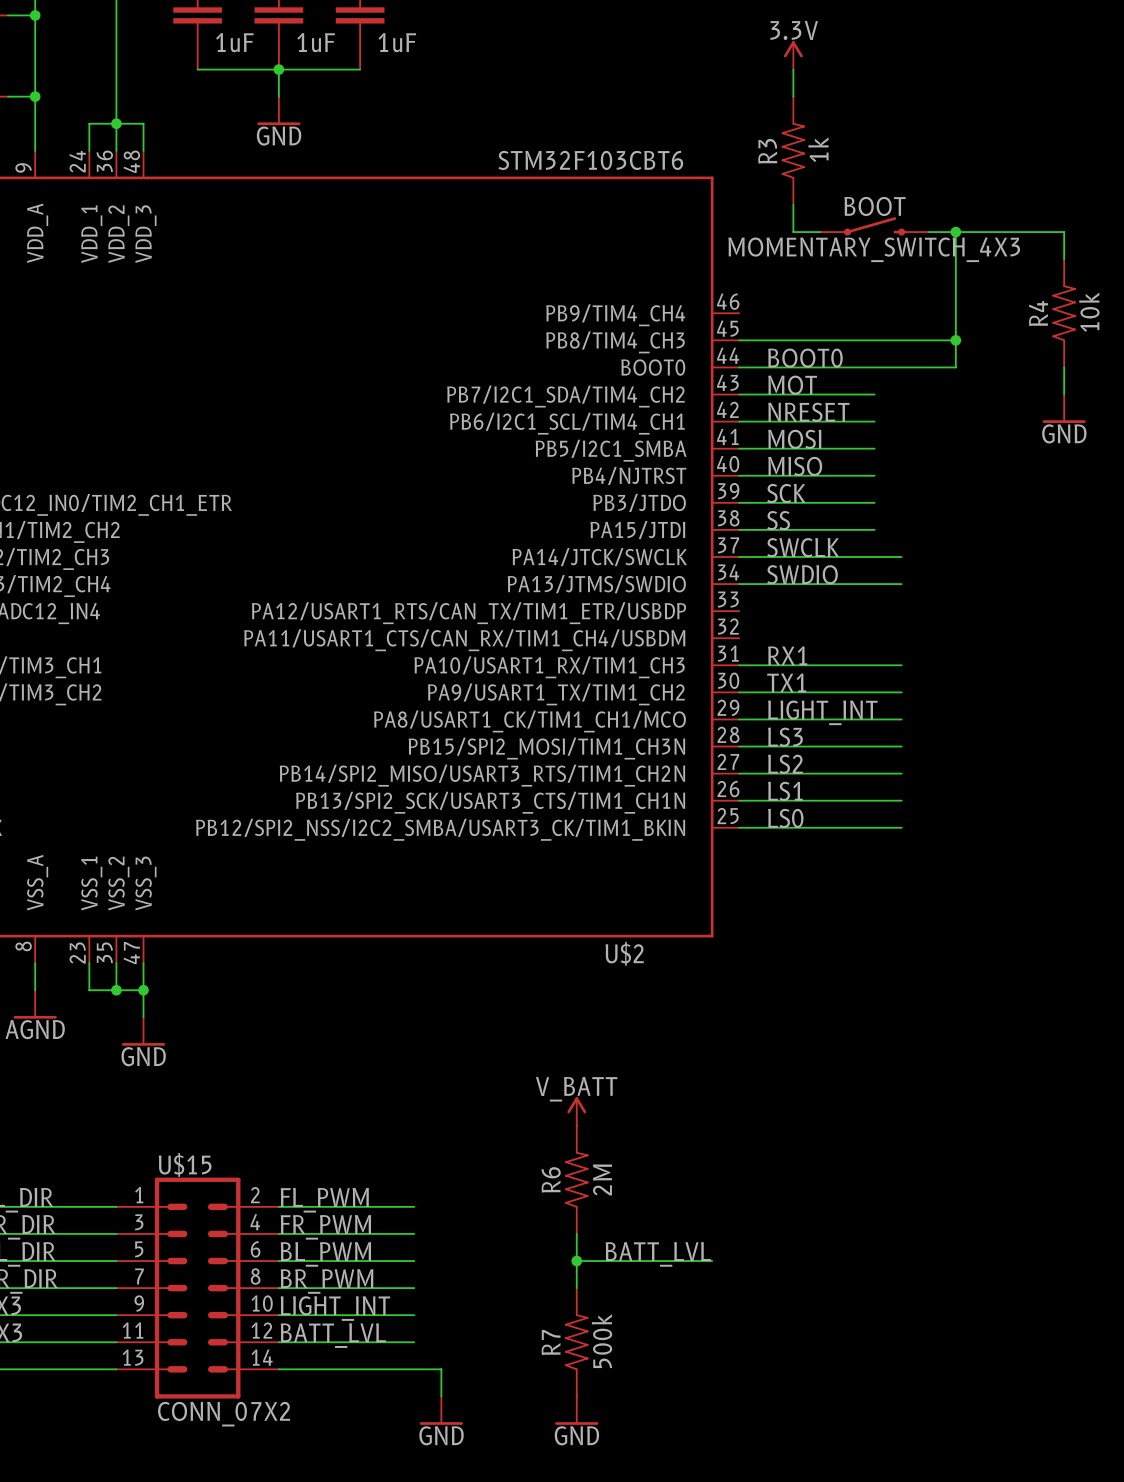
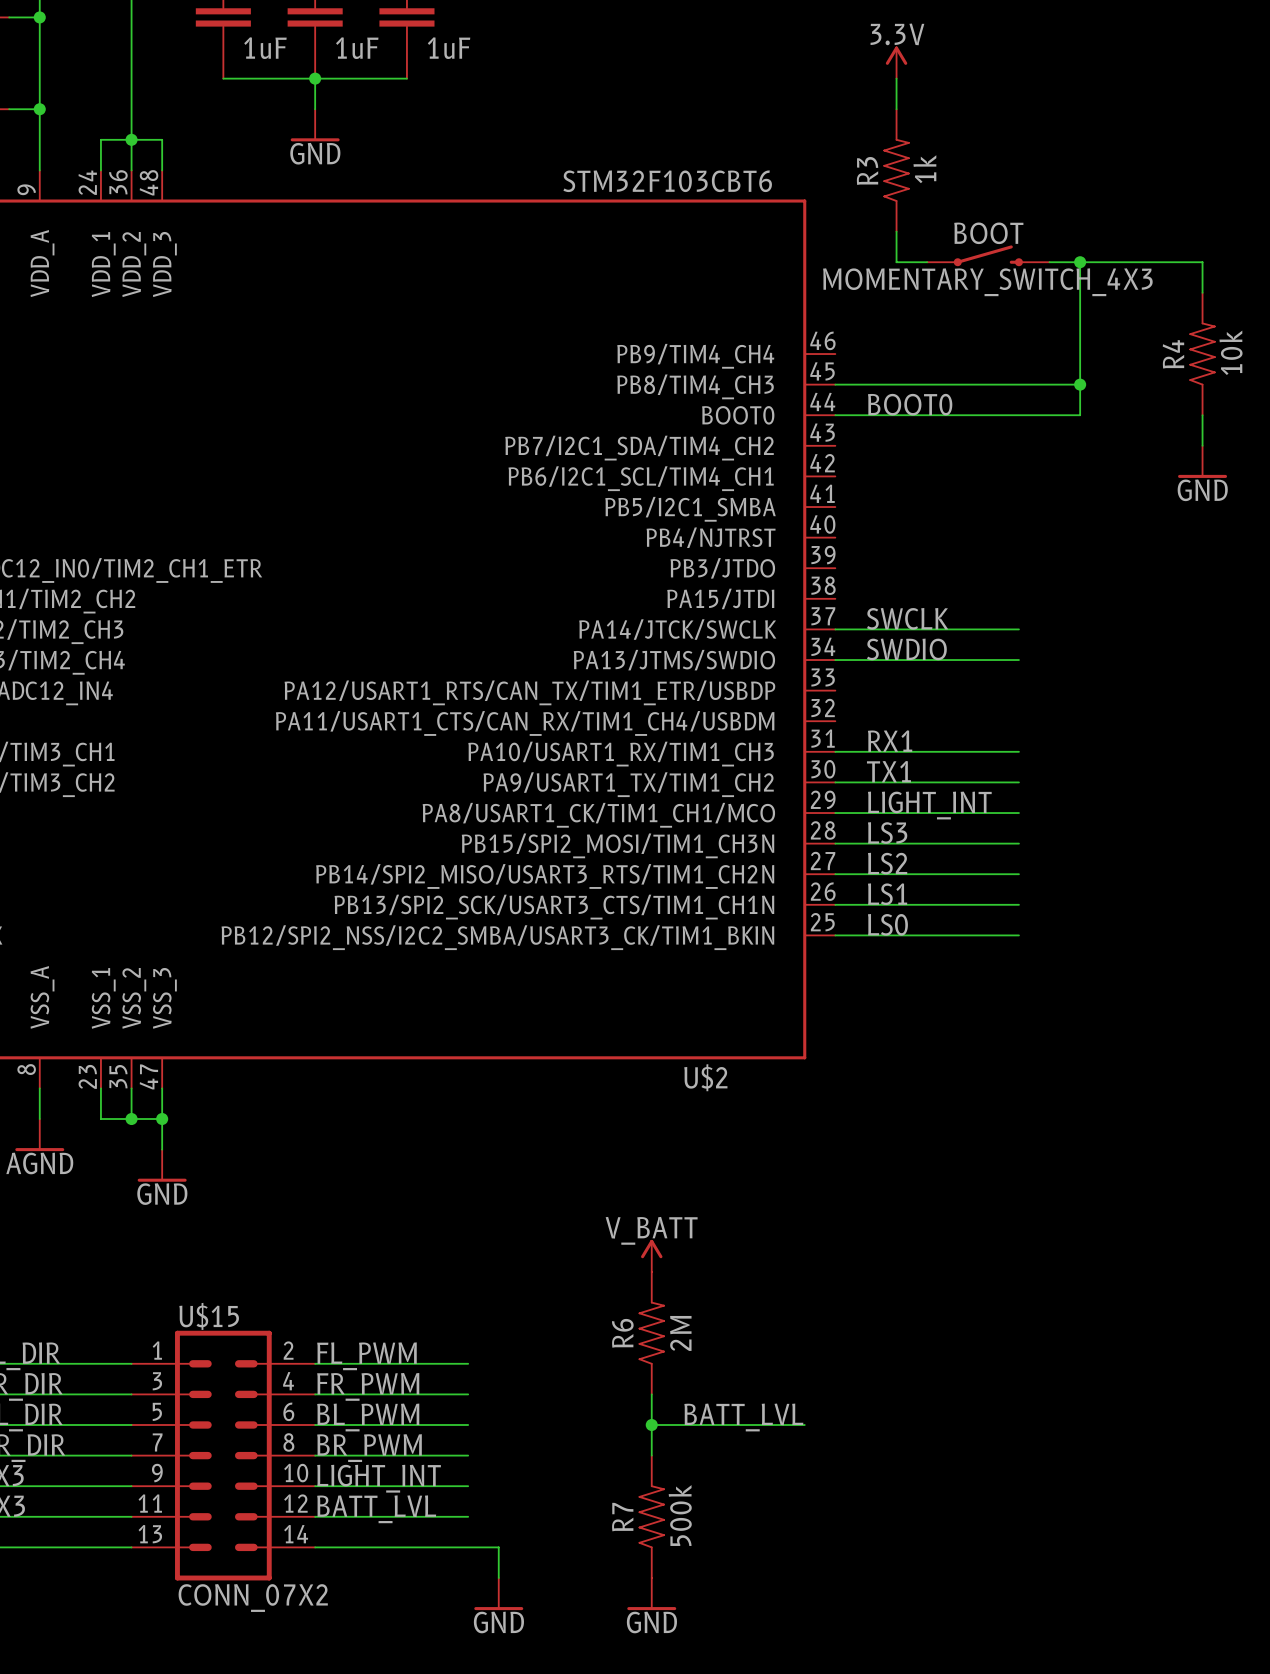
label: MOT (792, 385) -> none
wire: (739, 394) (874, 394) -> none
label: NRESET (808, 412) -> none
wire: (739, 421) (874, 421) -> none
label: MOSI (794, 439) -> none
wire: (739, 448) (874, 448) -> none
label: MISO (795, 466) -> none
wire: (739, 475) (874, 475) -> none
label: SCK (786, 493) -> none
wire: (739, 502) (874, 502) -> none
label: SS (778, 520) -> none
wire: (739, 529) (874, 529) -> none

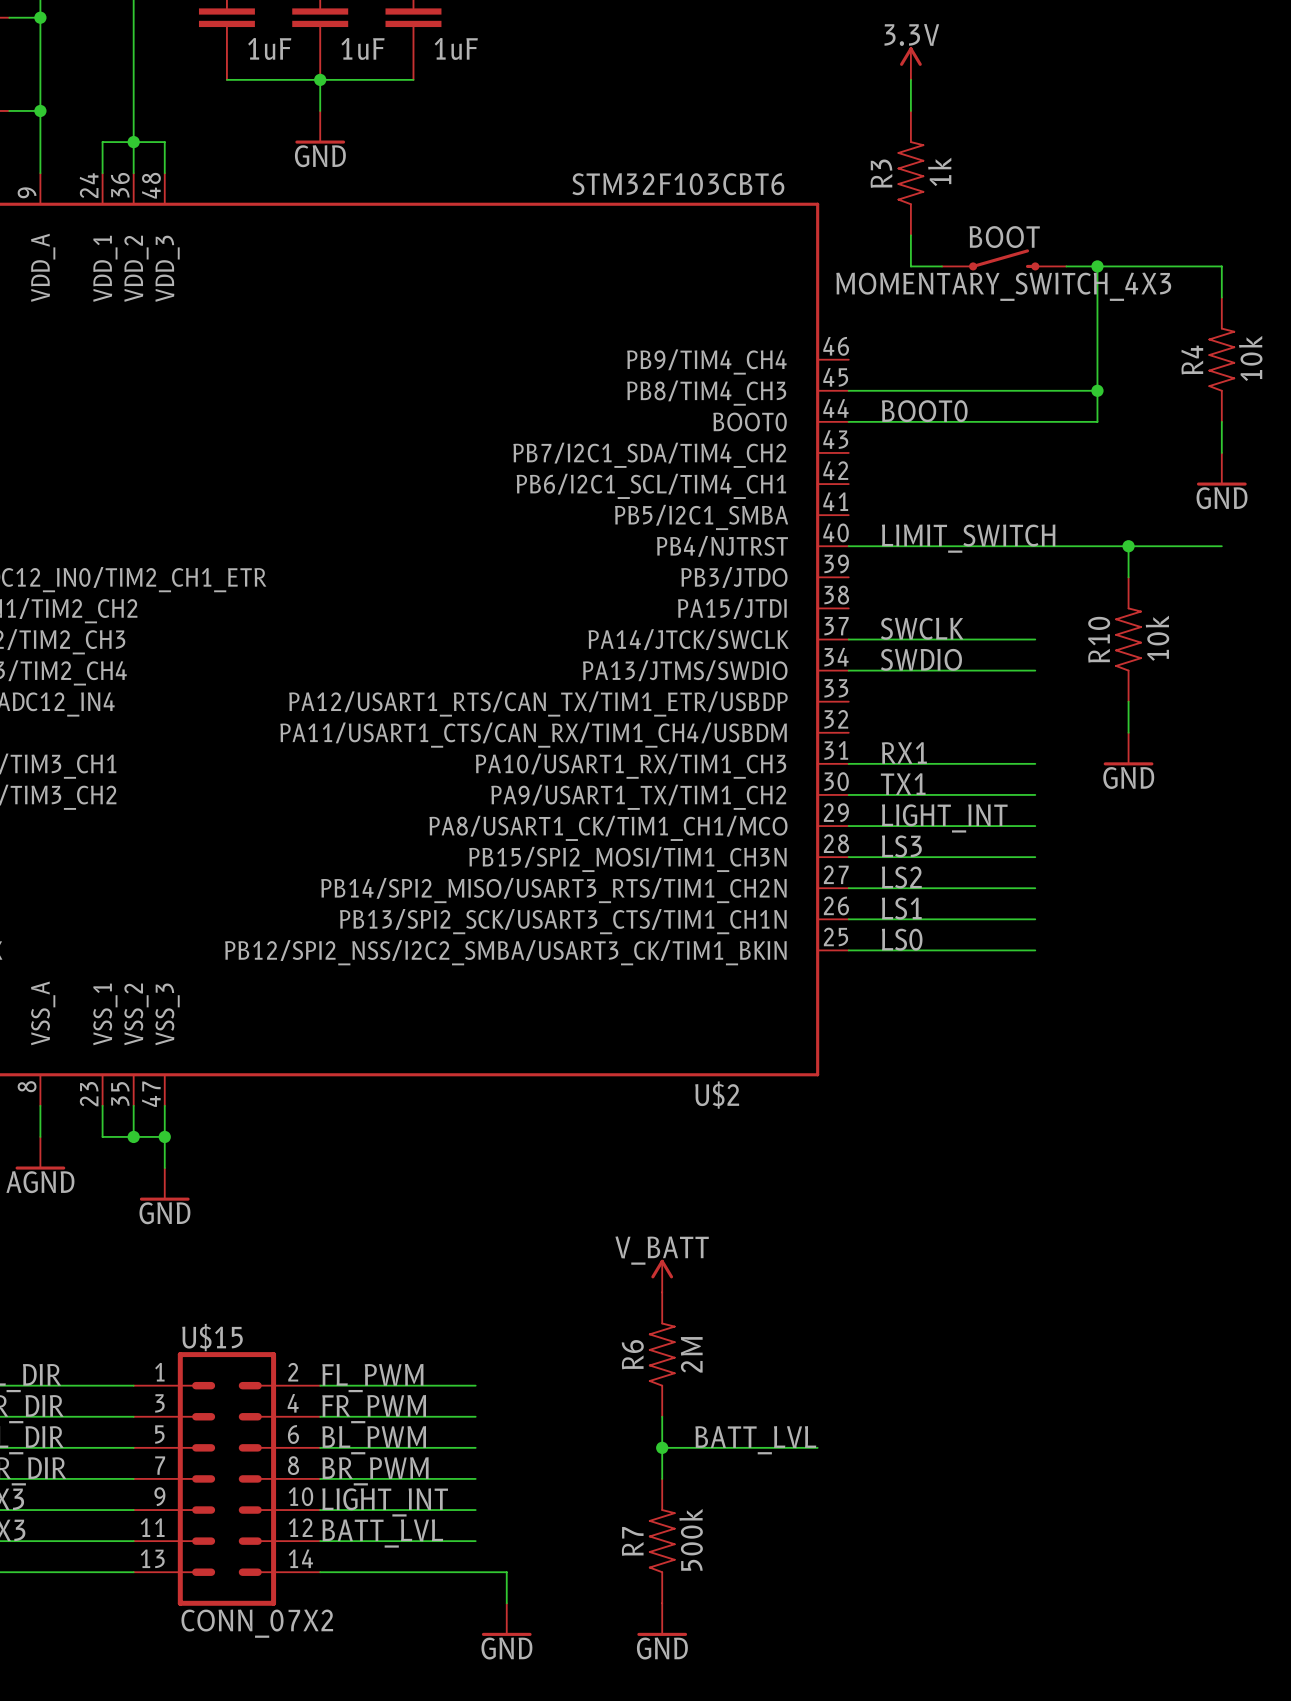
text: none -> LIMIT_SWITCH (968, 538)
wire: none -> (848, 546) (1221, 546)
wire: none -> (1128, 546) (1128, 577)
junction: none -> (1128, 546)
R10: none -> 10k (1128, 639)
wire: none -> (1128, 701) (1128, 732)
power symbol: none -> GND (1128, 749)

